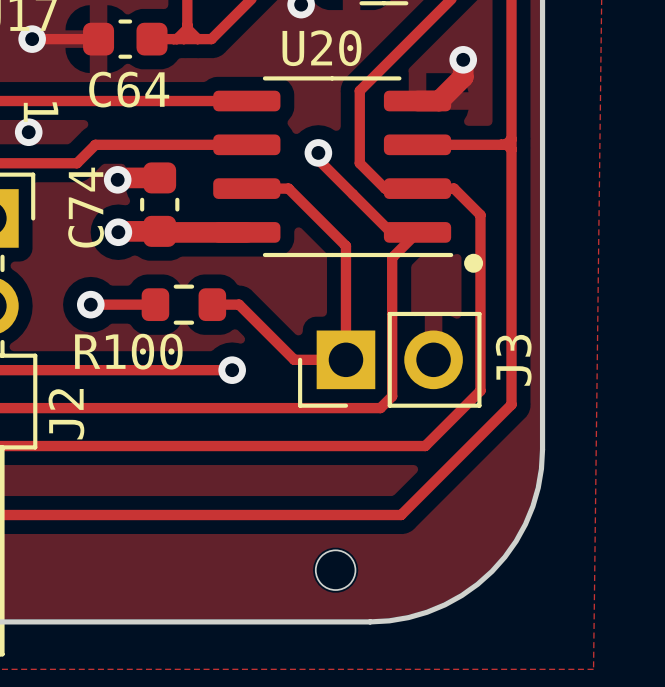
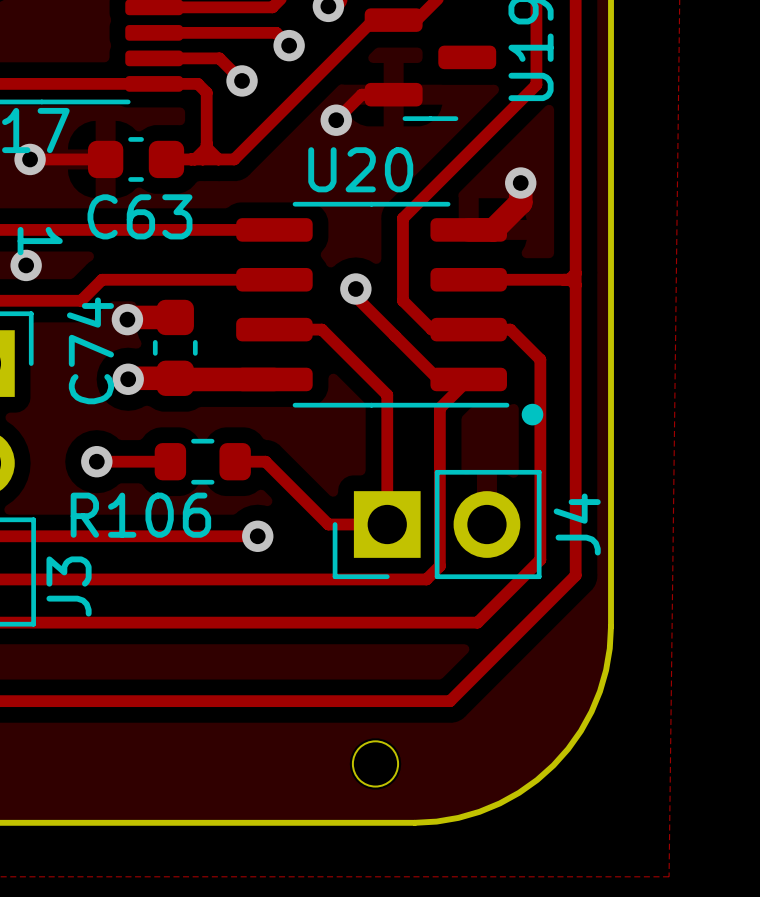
C64 name: C64 (129, 89) -> C63 (139, 216)
R100 name: R100 (128, 351) -> R106 (140, 515)
J3 name: J3 (513, 360) -> J4 (577, 524)
J2 name: J2 (66, 414) -> J3 (69, 586)

